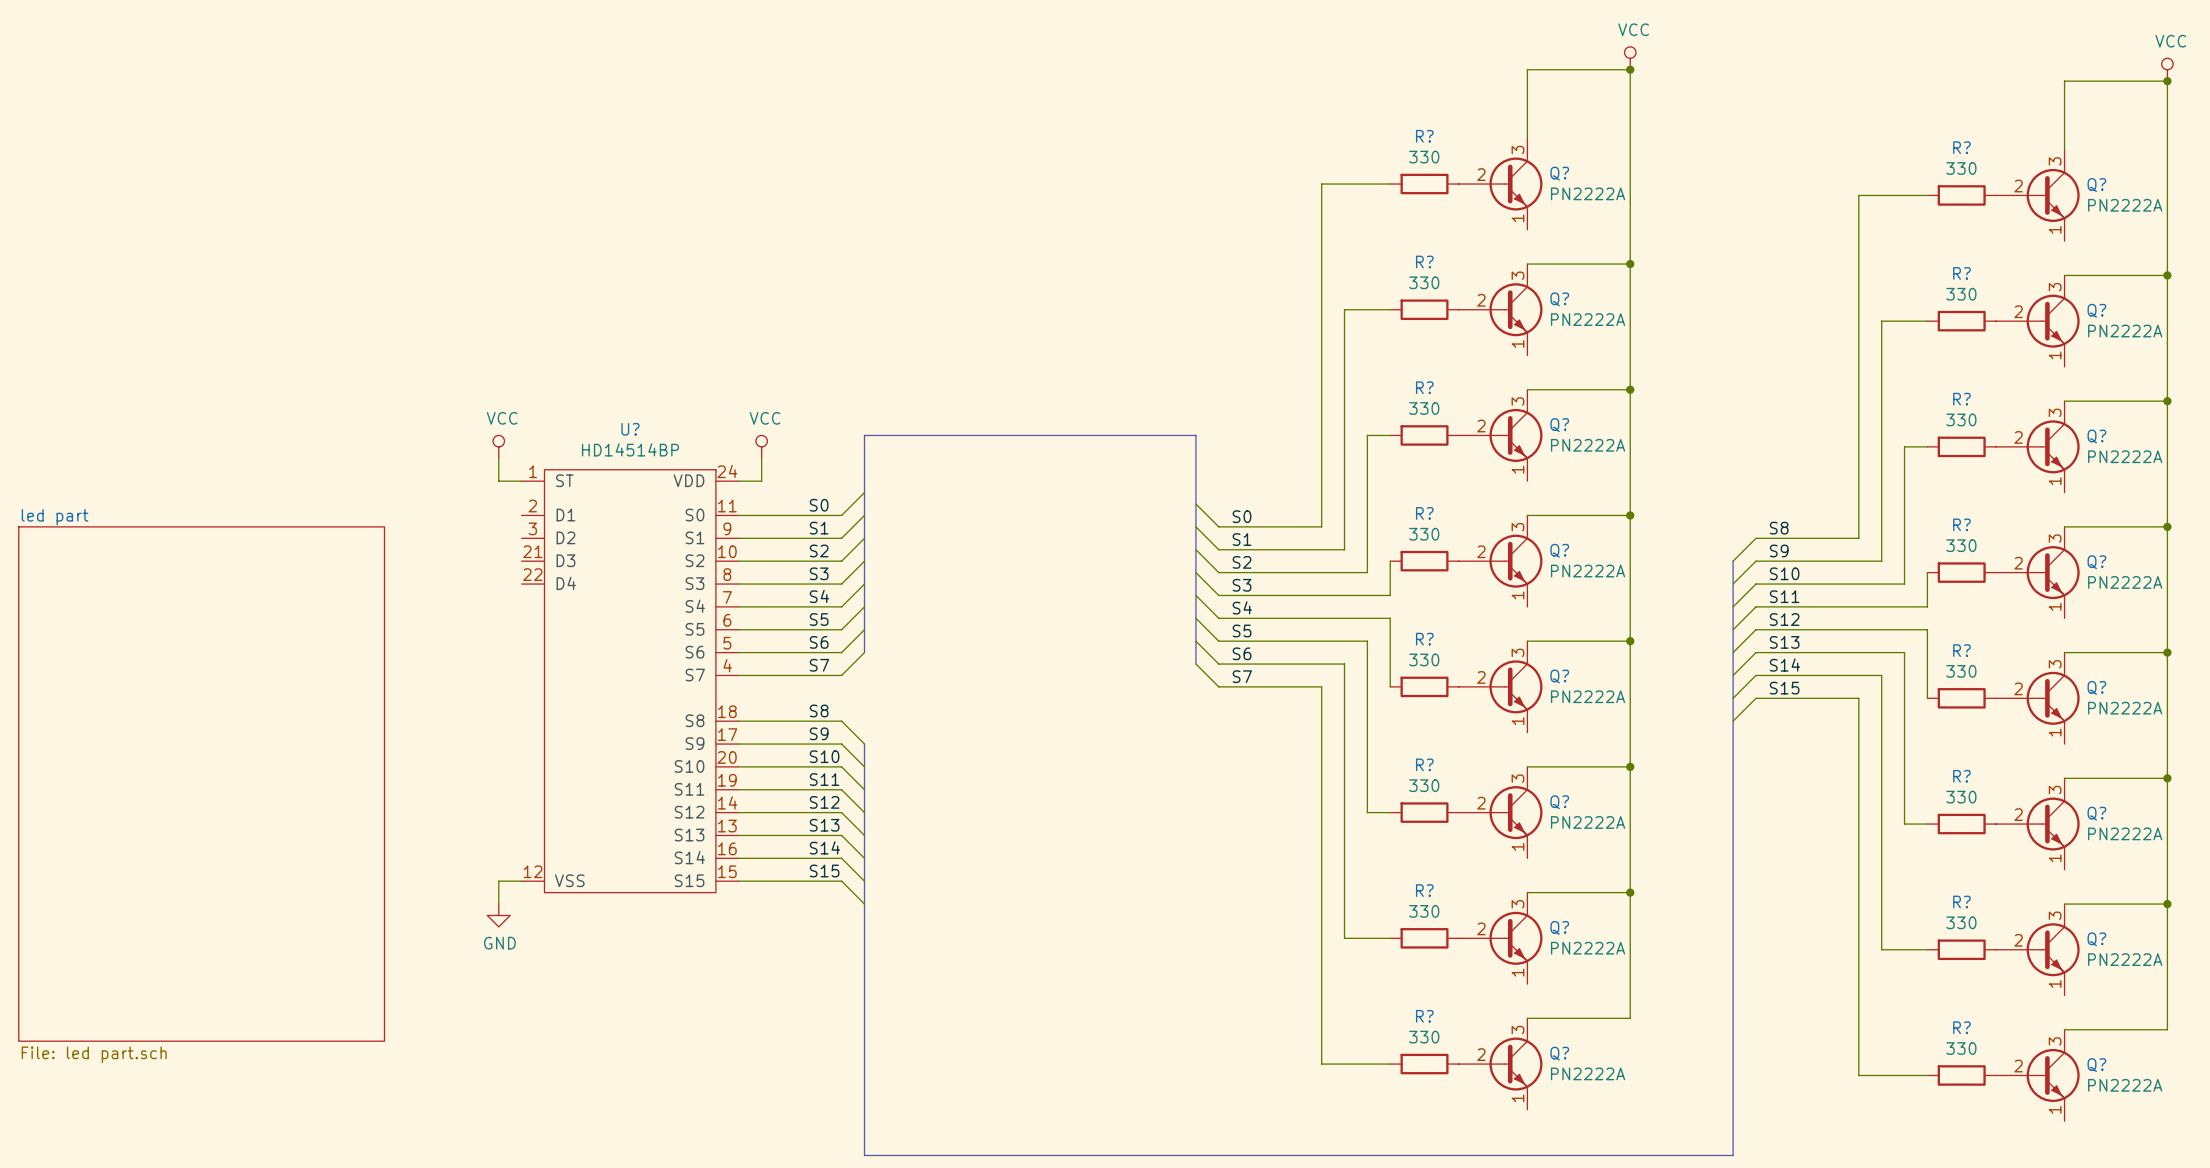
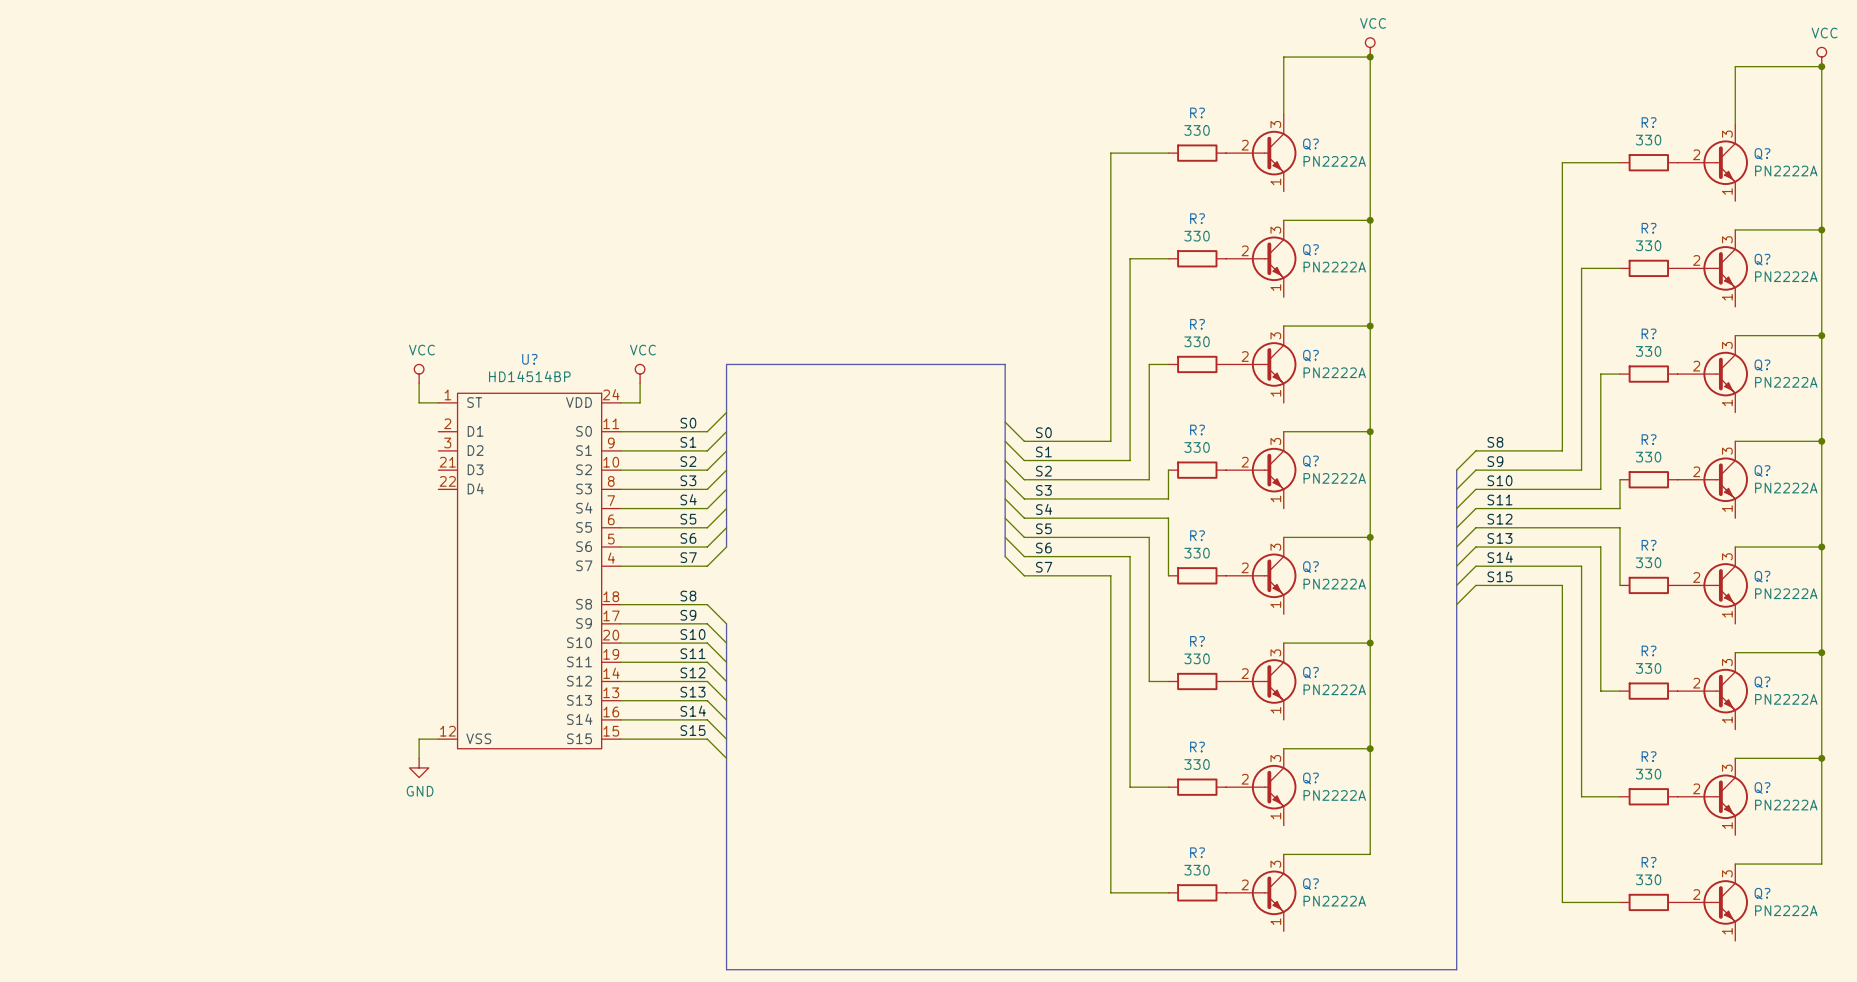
sheet led part: File: led part.sch (201, 784) -> none

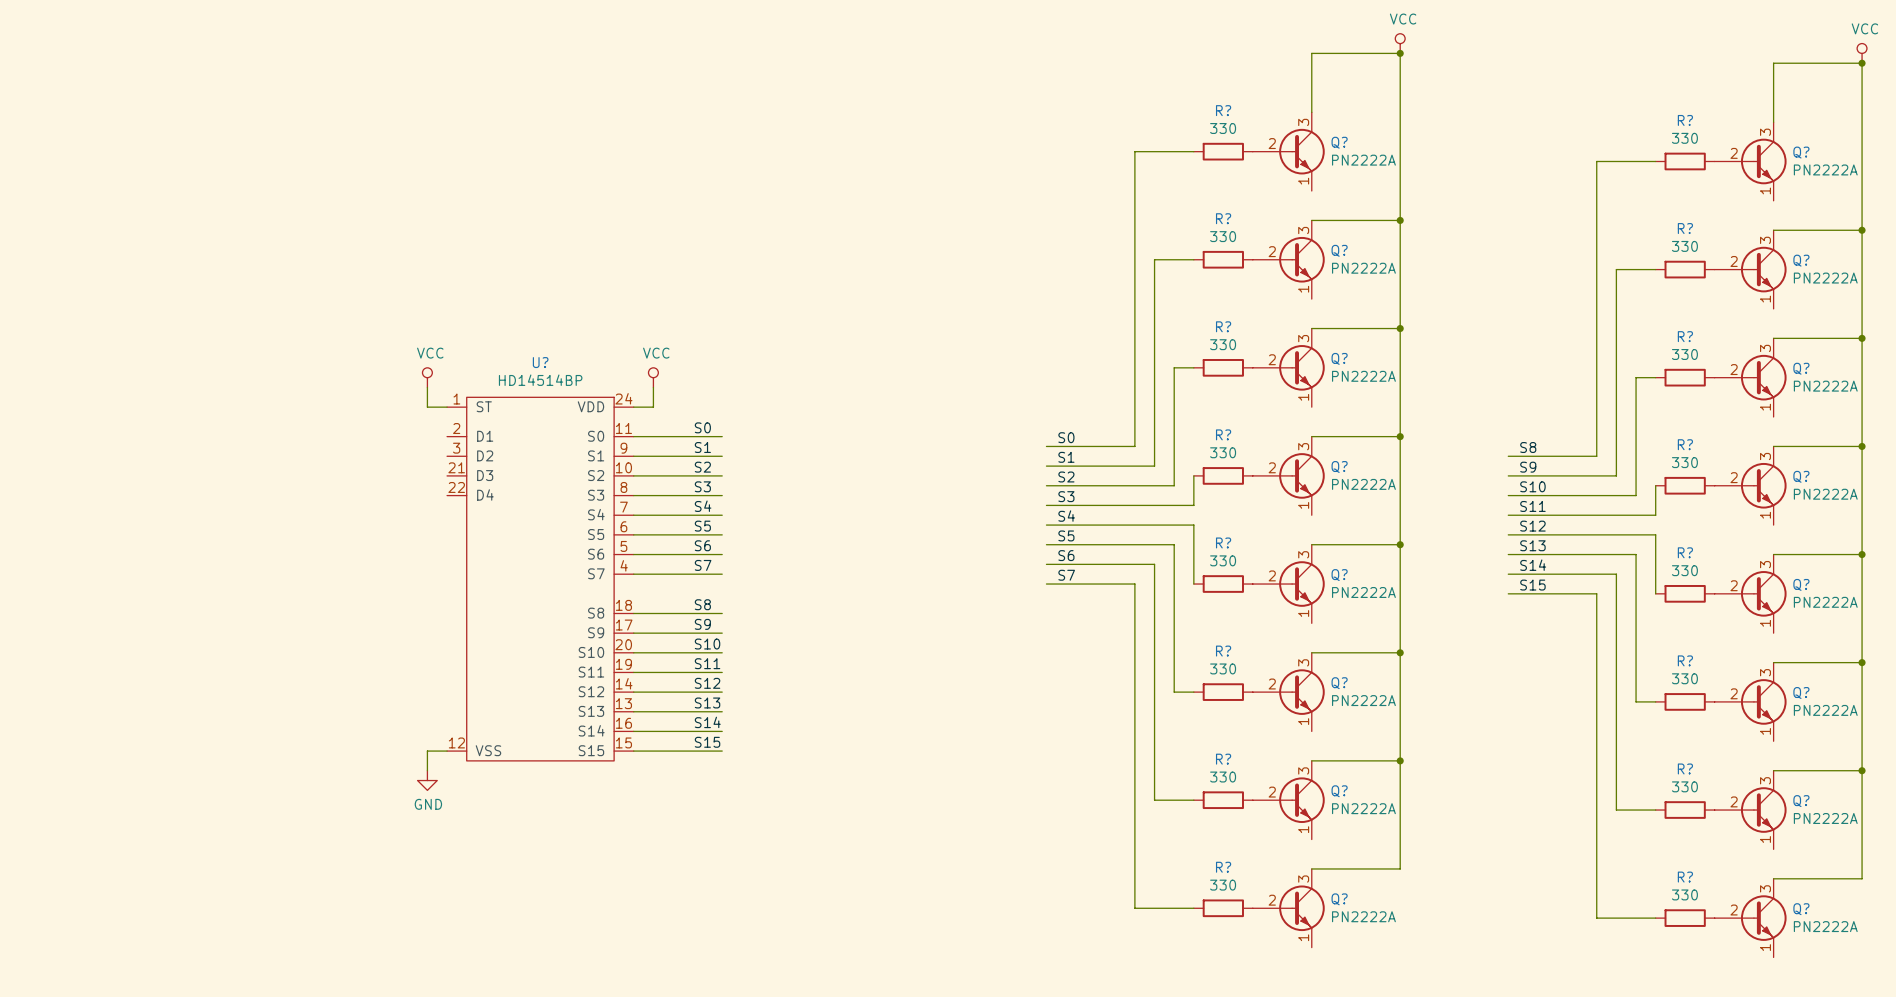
wire: (726, 412) (707, 431) -> none
wire: (1005, 422) (1024, 441) -> none
wire: (726, 431) (707, 450) -> none
wire: (1005, 441) (1024, 460) -> none
wire: (726, 450) (707, 470) -> none
wire: (1475, 450) (1456, 470) -> none
wire: (1005, 460) (1024, 479) -> none
wire: (726, 470) (707, 489) -> none
bus: (1456, 470) (1456, 969) (726, 969) (726, 623) -> none
wire: (1475, 470) (1456, 489) -> none
wire: (1005, 479) (1024, 498) -> none
wire: (726, 489) (707, 508) -> none
wire: (1475, 489) (1456, 508) -> none
wire: (1005, 498) (1024, 518) -> none
wire: (726, 508) (707, 527) -> none
wire: (1475, 508) (1456, 527) -> none
wire: (1005, 518) (1024, 537) -> none
wire: (726, 527) (707, 546) -> none
wire: (1475, 527) (1456, 546) -> none
wire: (1005, 537) (1024, 556) -> none
wire: (726, 546) (707, 566) -> none
bus: (726, 546) (726, 364) (1005, 364) (1005, 556) -> none
wire: (1475, 546) (1456, 566) -> none
wire: (1005, 556) (1024, 575) -> none
wire: (1475, 566) (1456, 585) -> none
wire: (1475, 585) (1456, 604) -> none
wire: (707, 604) (726, 623) -> none
wire: (707, 623) (726, 643) -> none
wire: (707, 643) (726, 662) -> none
wire: (707, 662) (726, 681) -> none
wire: (707, 681) (726, 700) -> none
wire: (707, 700) (726, 719) -> none
wire: (707, 719) (726, 739) -> none
wire: (707, 739) (726, 758) -> none

